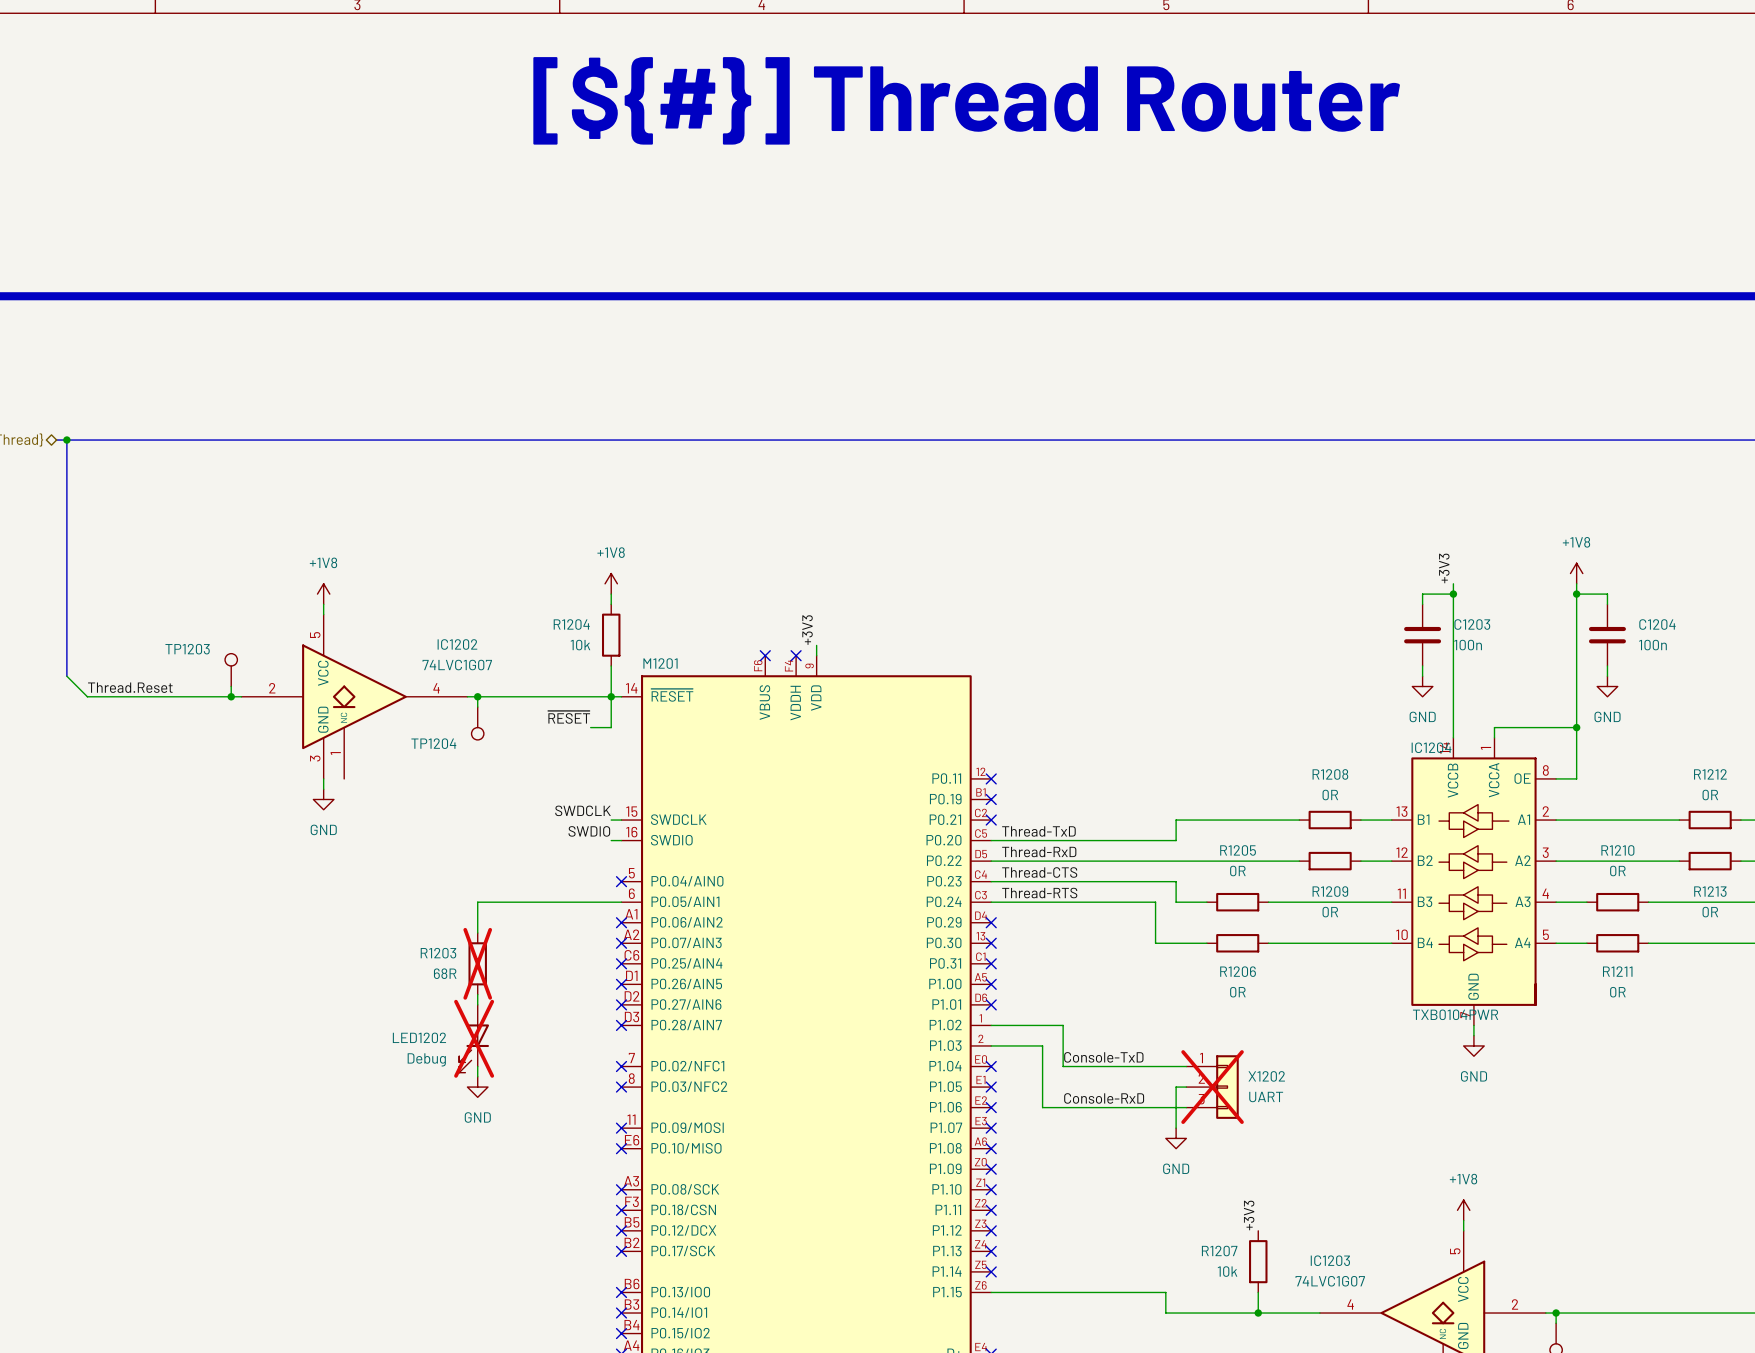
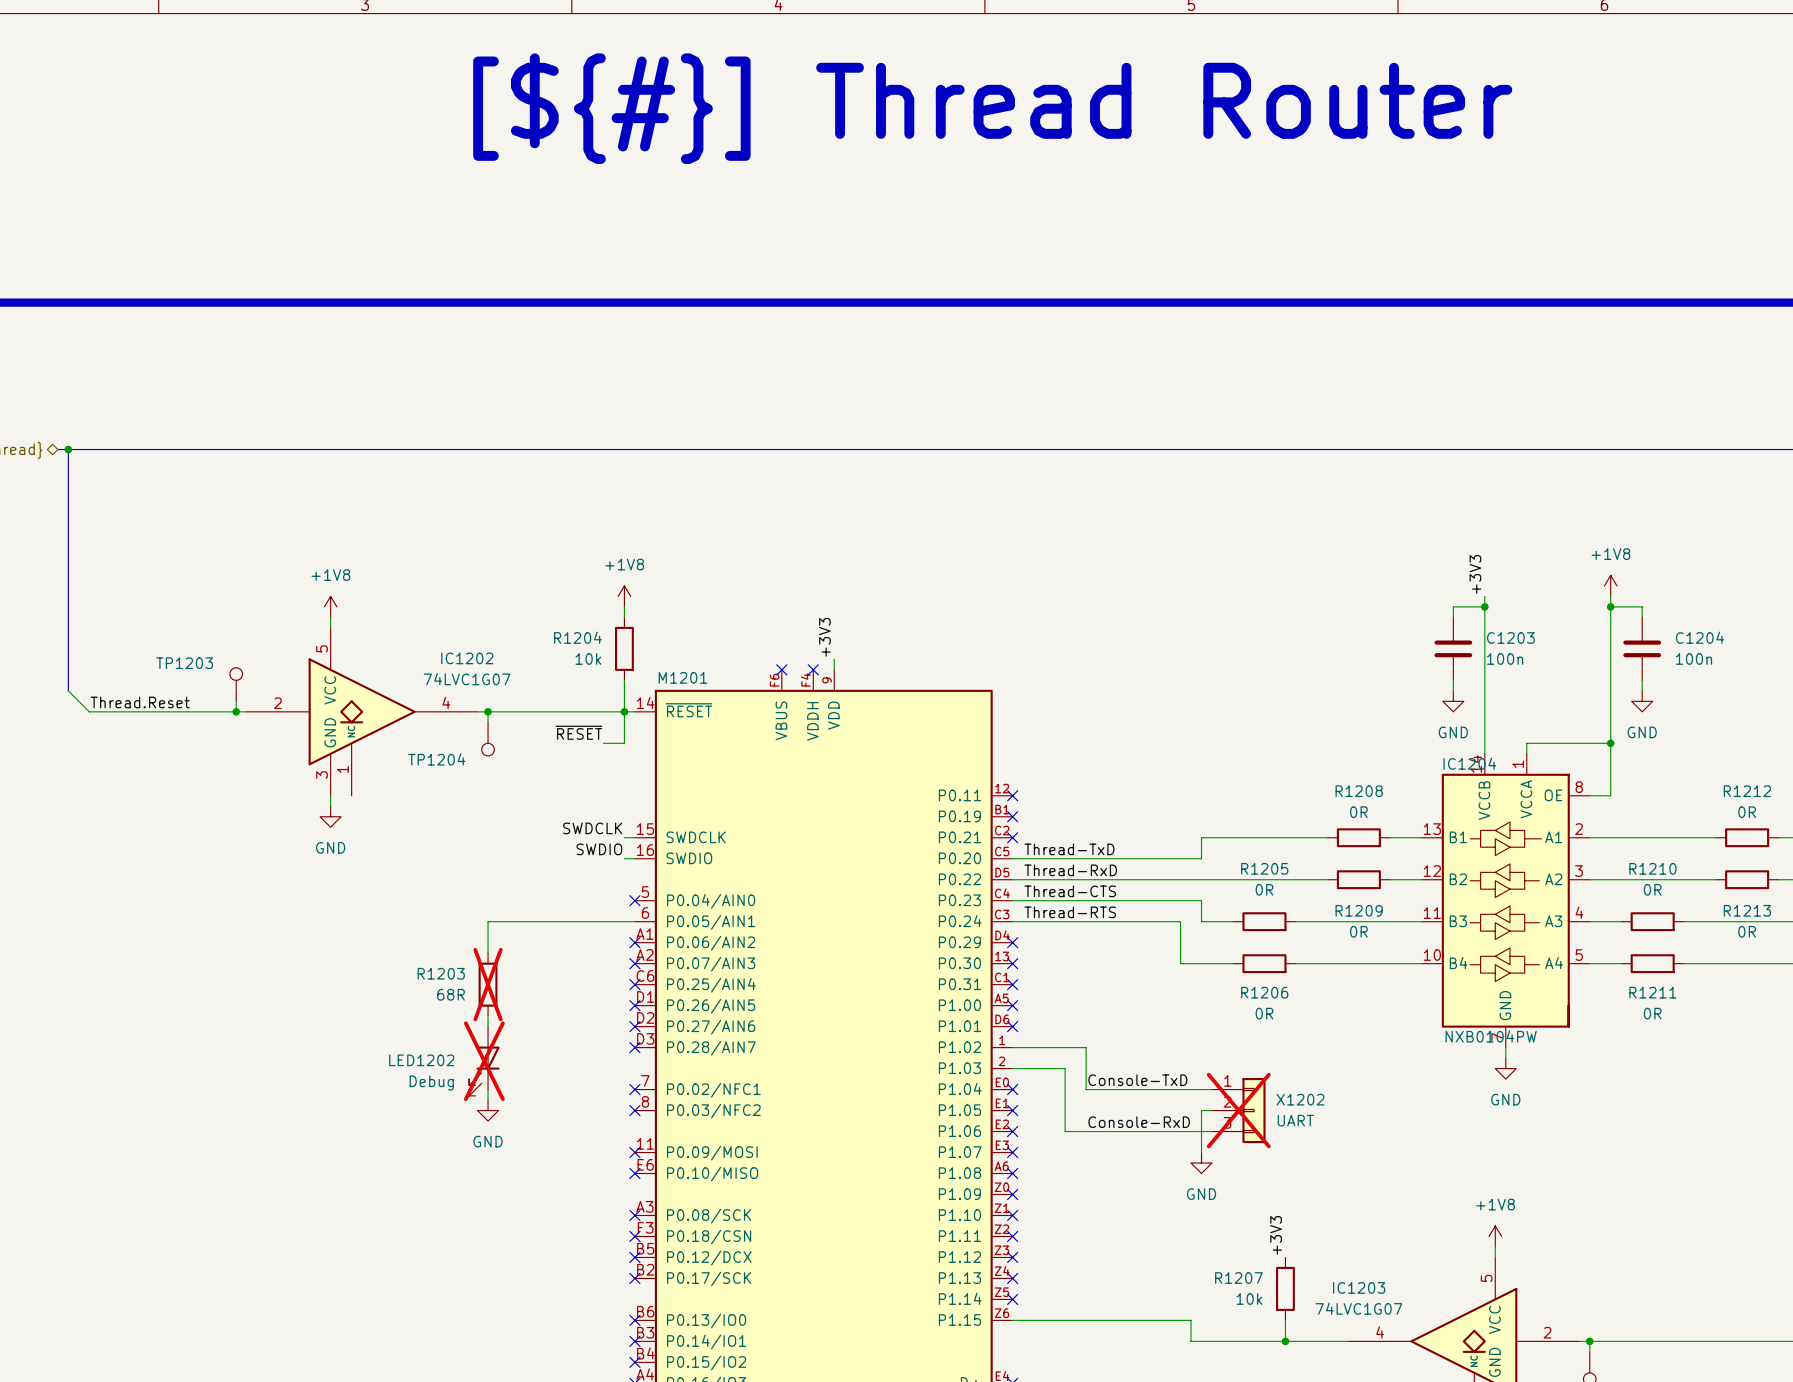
IC1204 value: TXB0104PWR (1455, 1014) -> NXB0104PW (1491, 1036)

